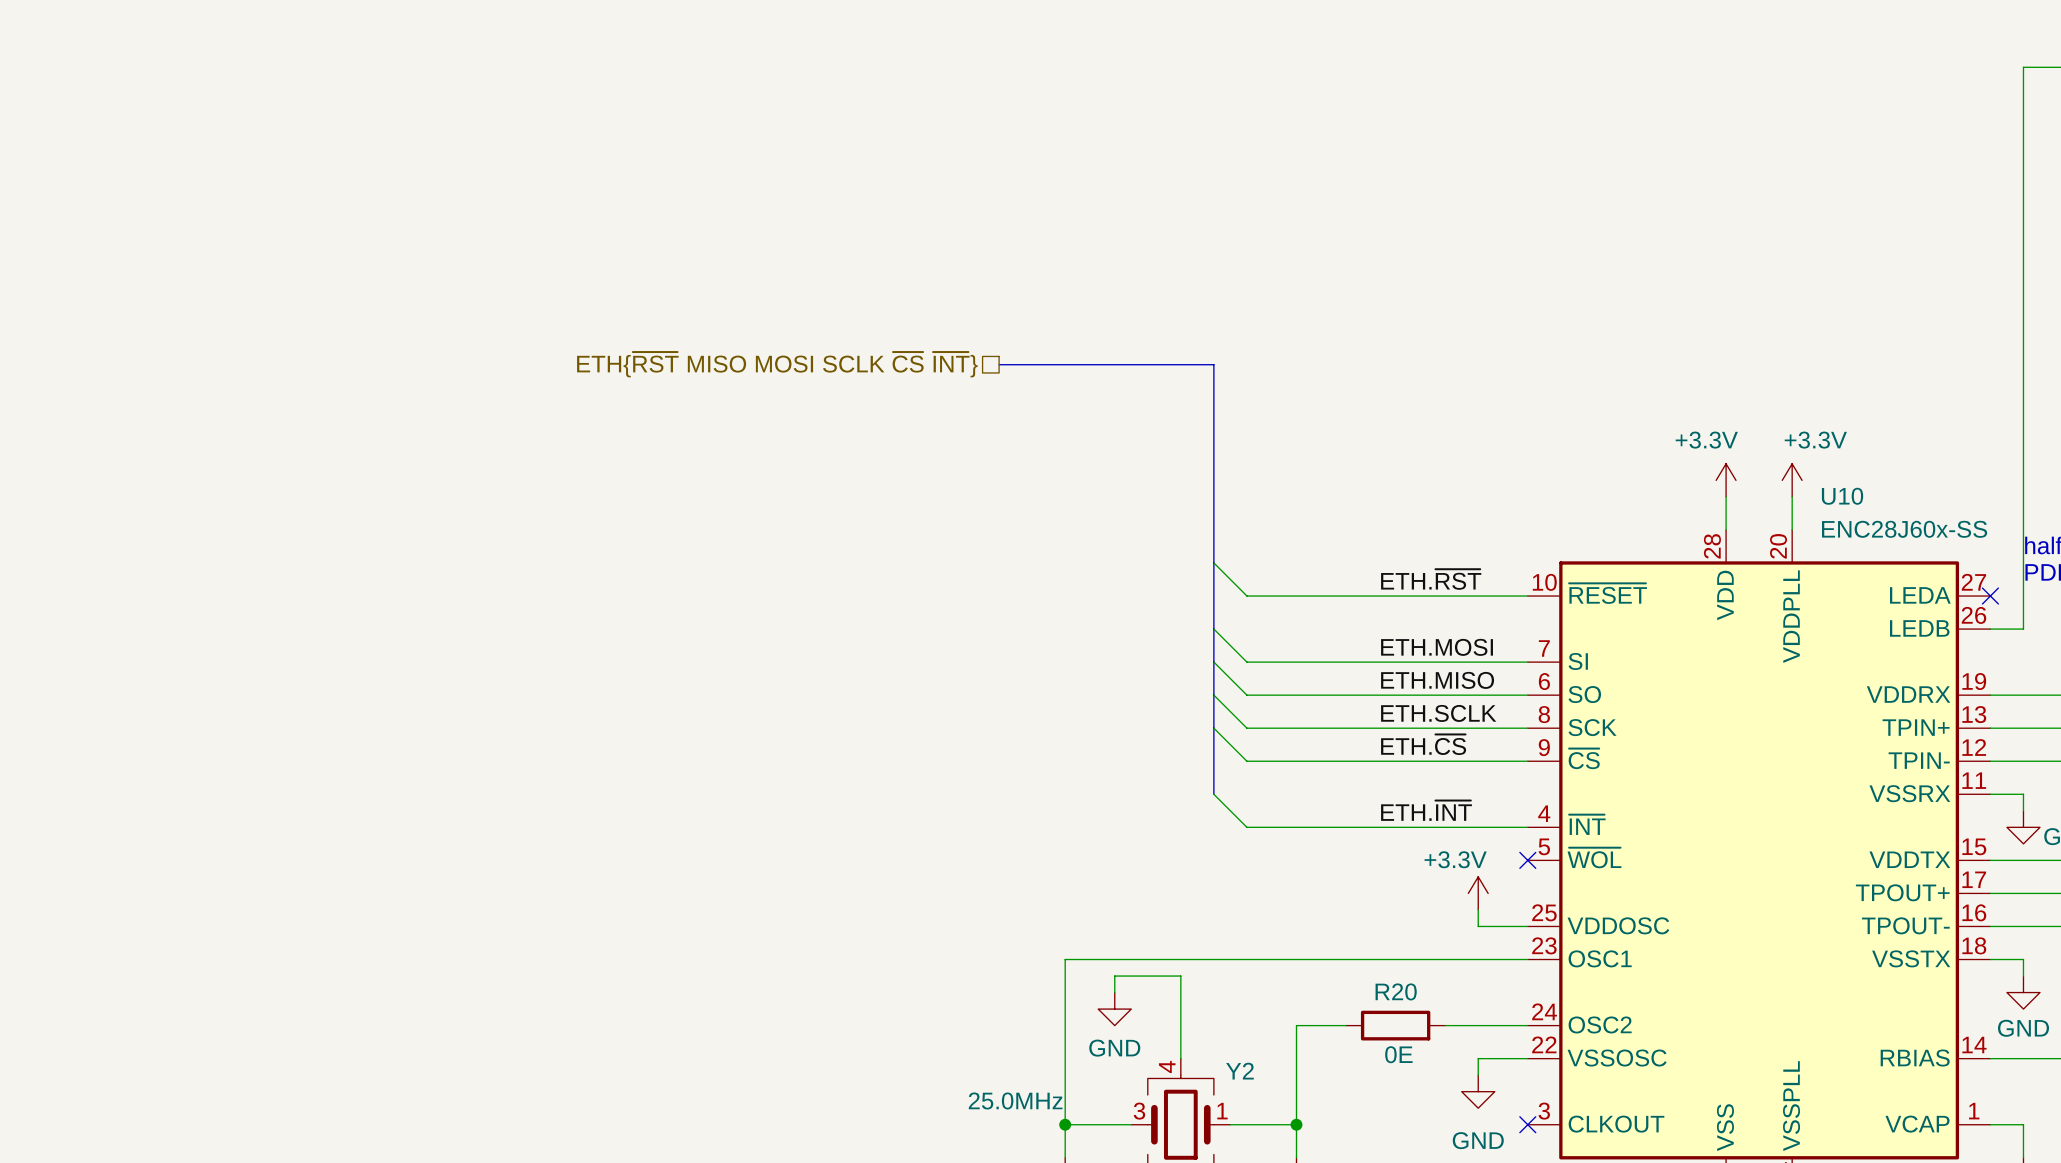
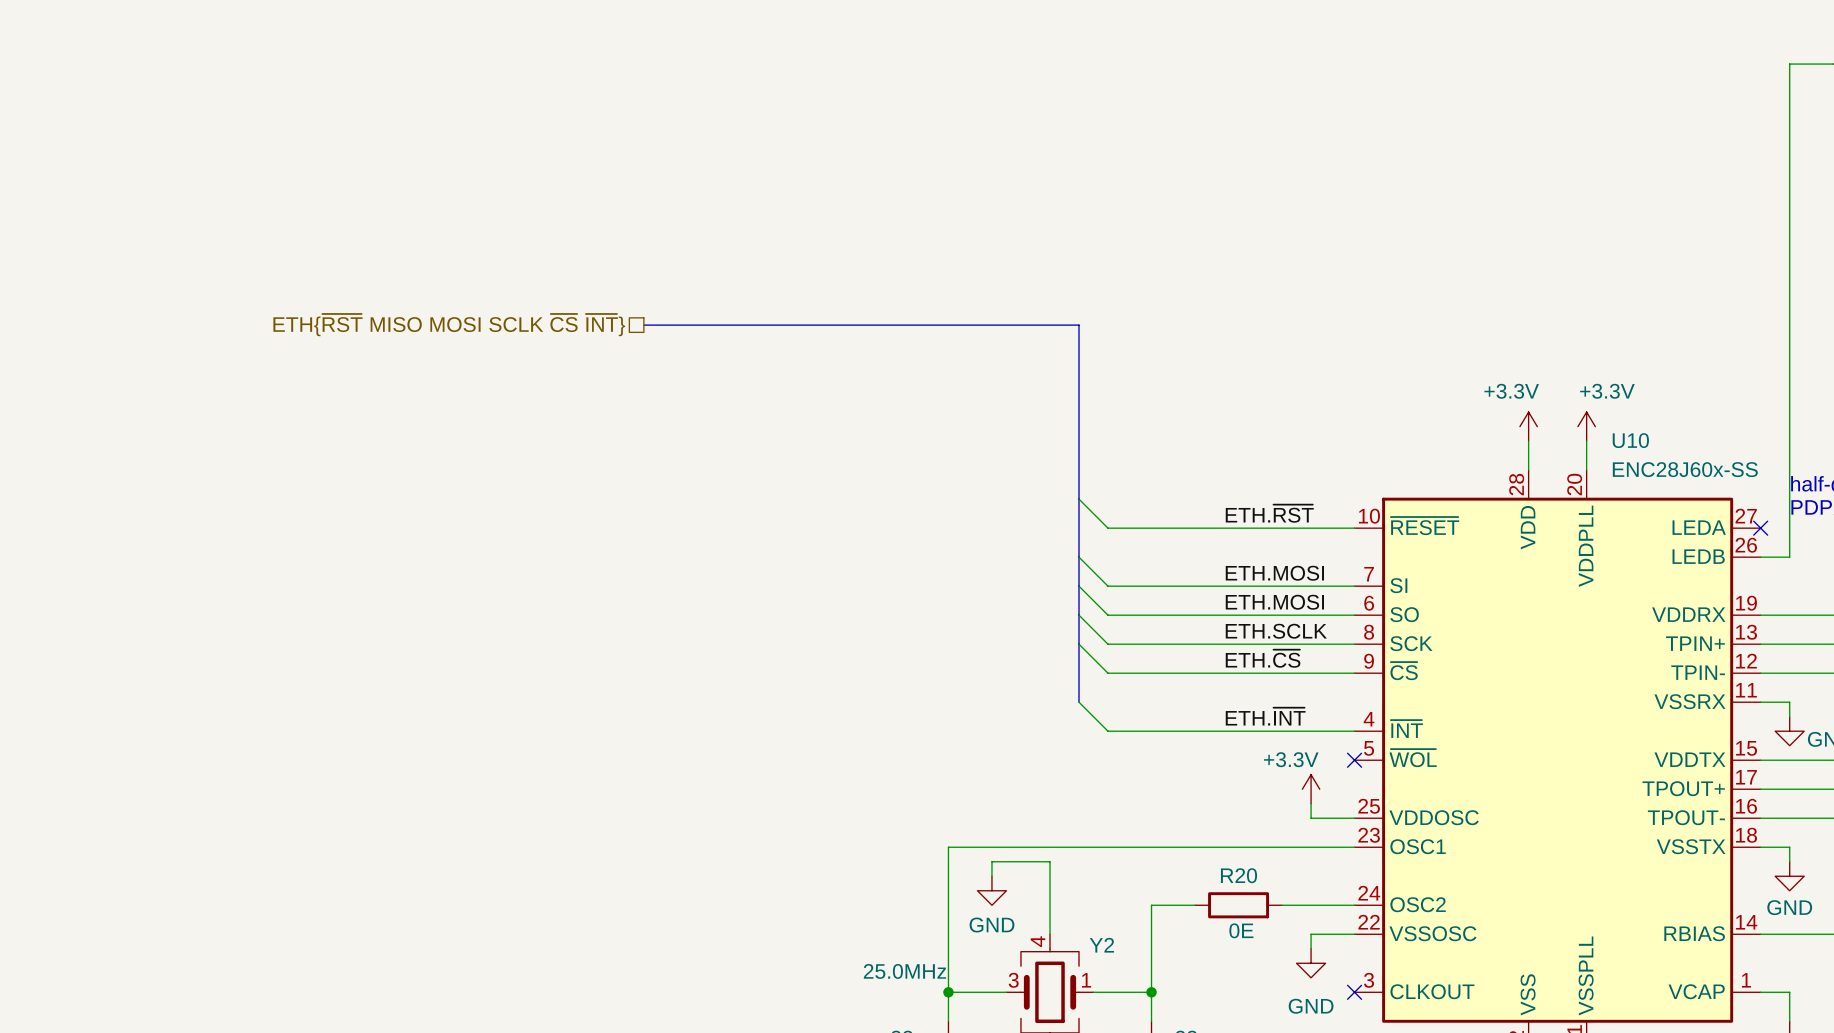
bus: none -> (643, 325) (890, 325)
hierarchical label position: ETH{~{RST} MISO MOSI SCLK ~{CS} ~{INT}} (777, 364) -> ETH{~{RST} MISO MOSI SCLK ~{CS} ~{INT}} (449, 325)
label: ETH.MISO (1437, 680) -> ETH.MOSI (1274, 602)

